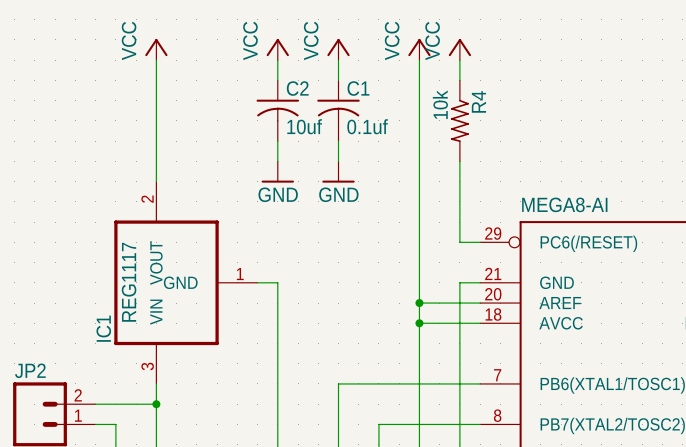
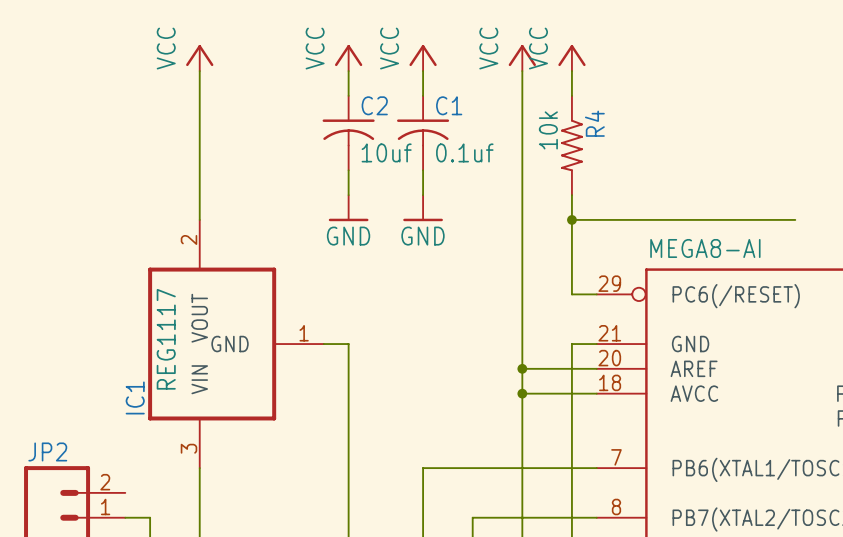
wire: none -> (571, 219) (795, 219)
junction: none -> (571, 219)
wire: (95, 404) (156, 404) -> none
junction: (156, 404) -> none

